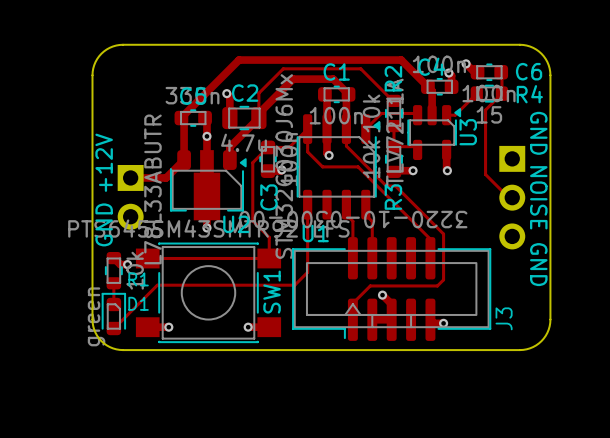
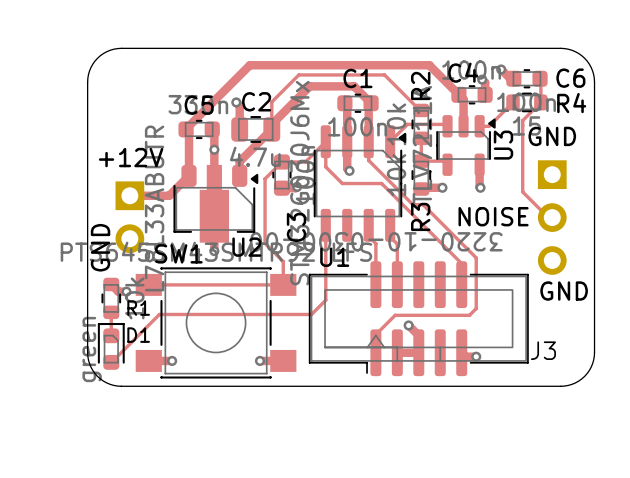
part text rotation: 0° (538, 133) -> 90° counterclockwise (552, 136)
part text rotation: 0° (104, 162) -> 90° clockwise (131, 157)
C3 name position: C3 (268, 197) -> C3 (296, 227)
part text rotation: 0° (538, 197) -> 90° counterclockwise (493, 216)
part text rotation: 0° (538, 264) -> 90° counterclockwise (564, 291)
SW1 name rotation: 0° (272, 292) -> 90° clockwise (178, 253)
SW1 name position: SW1 (272, 292) -> SW1 (178, 253)
J3 name rotation: 0° (504, 318) -> 90° clockwise (543, 350)

